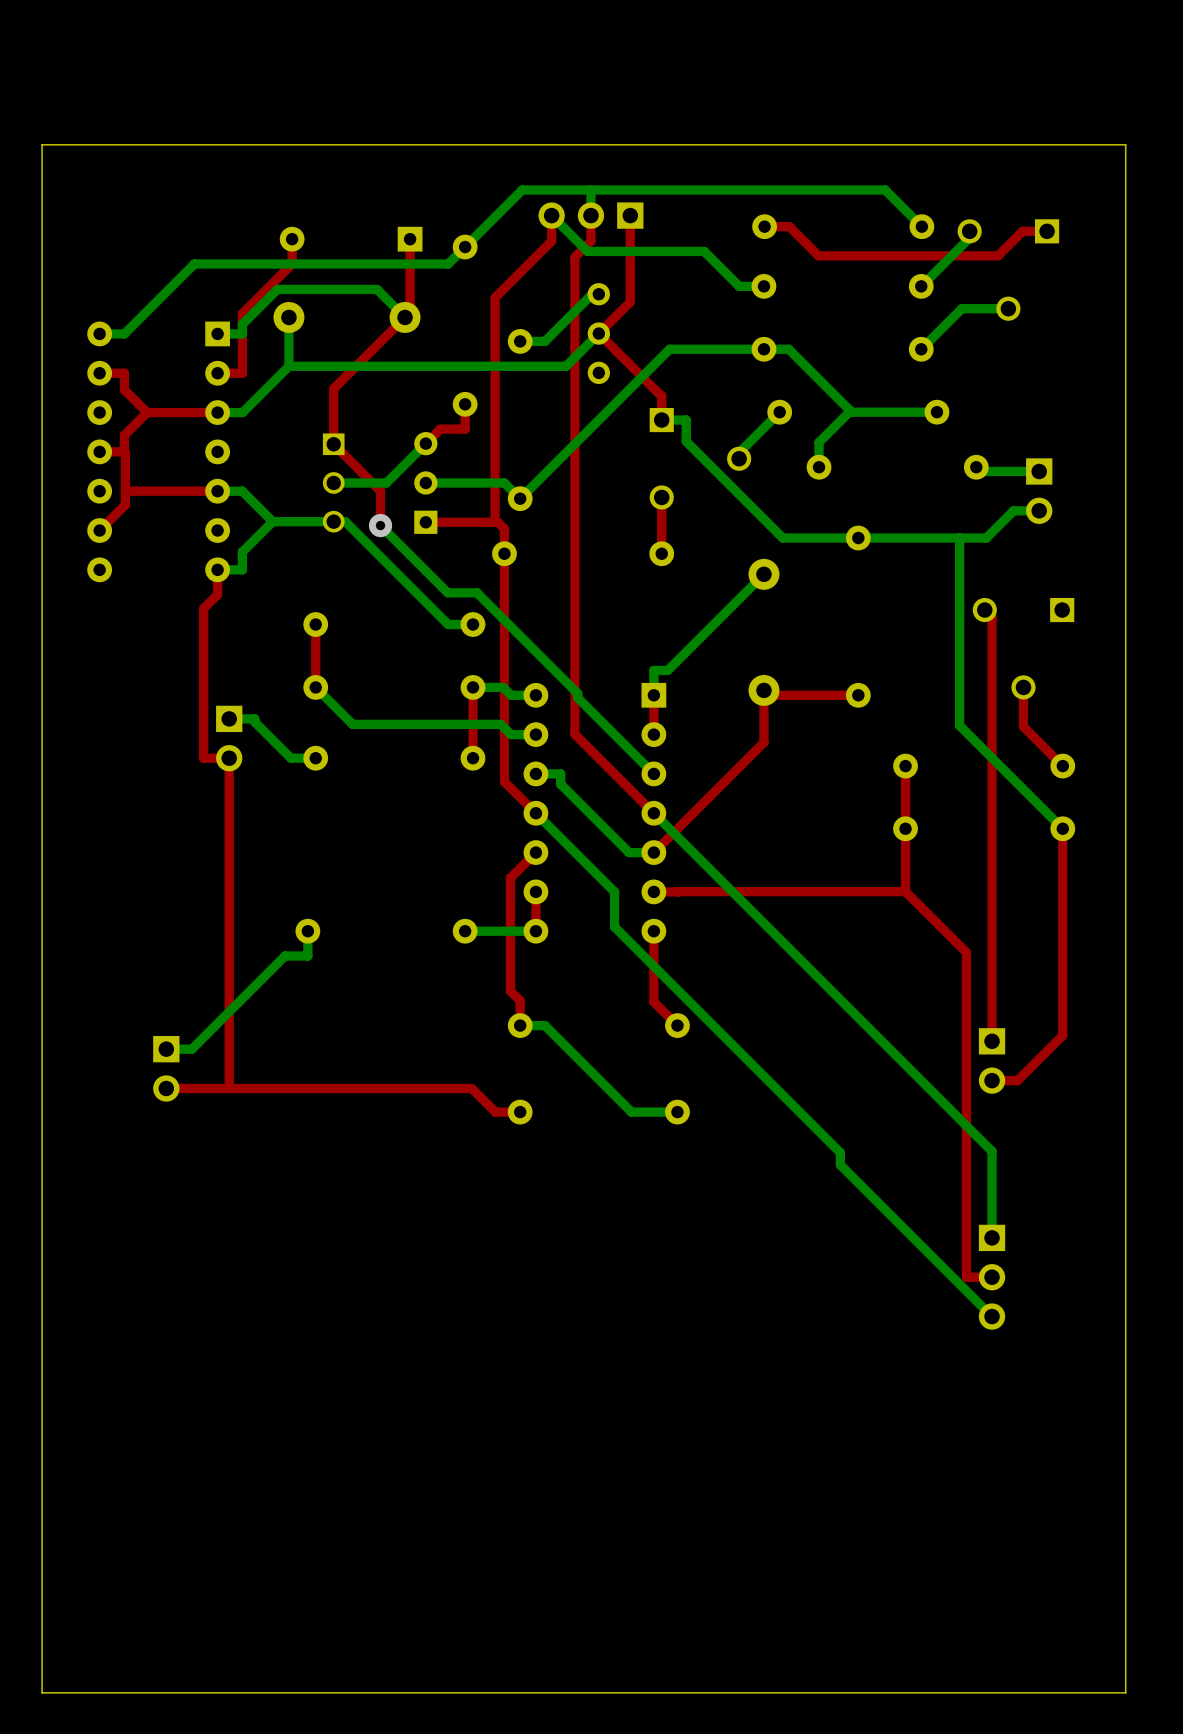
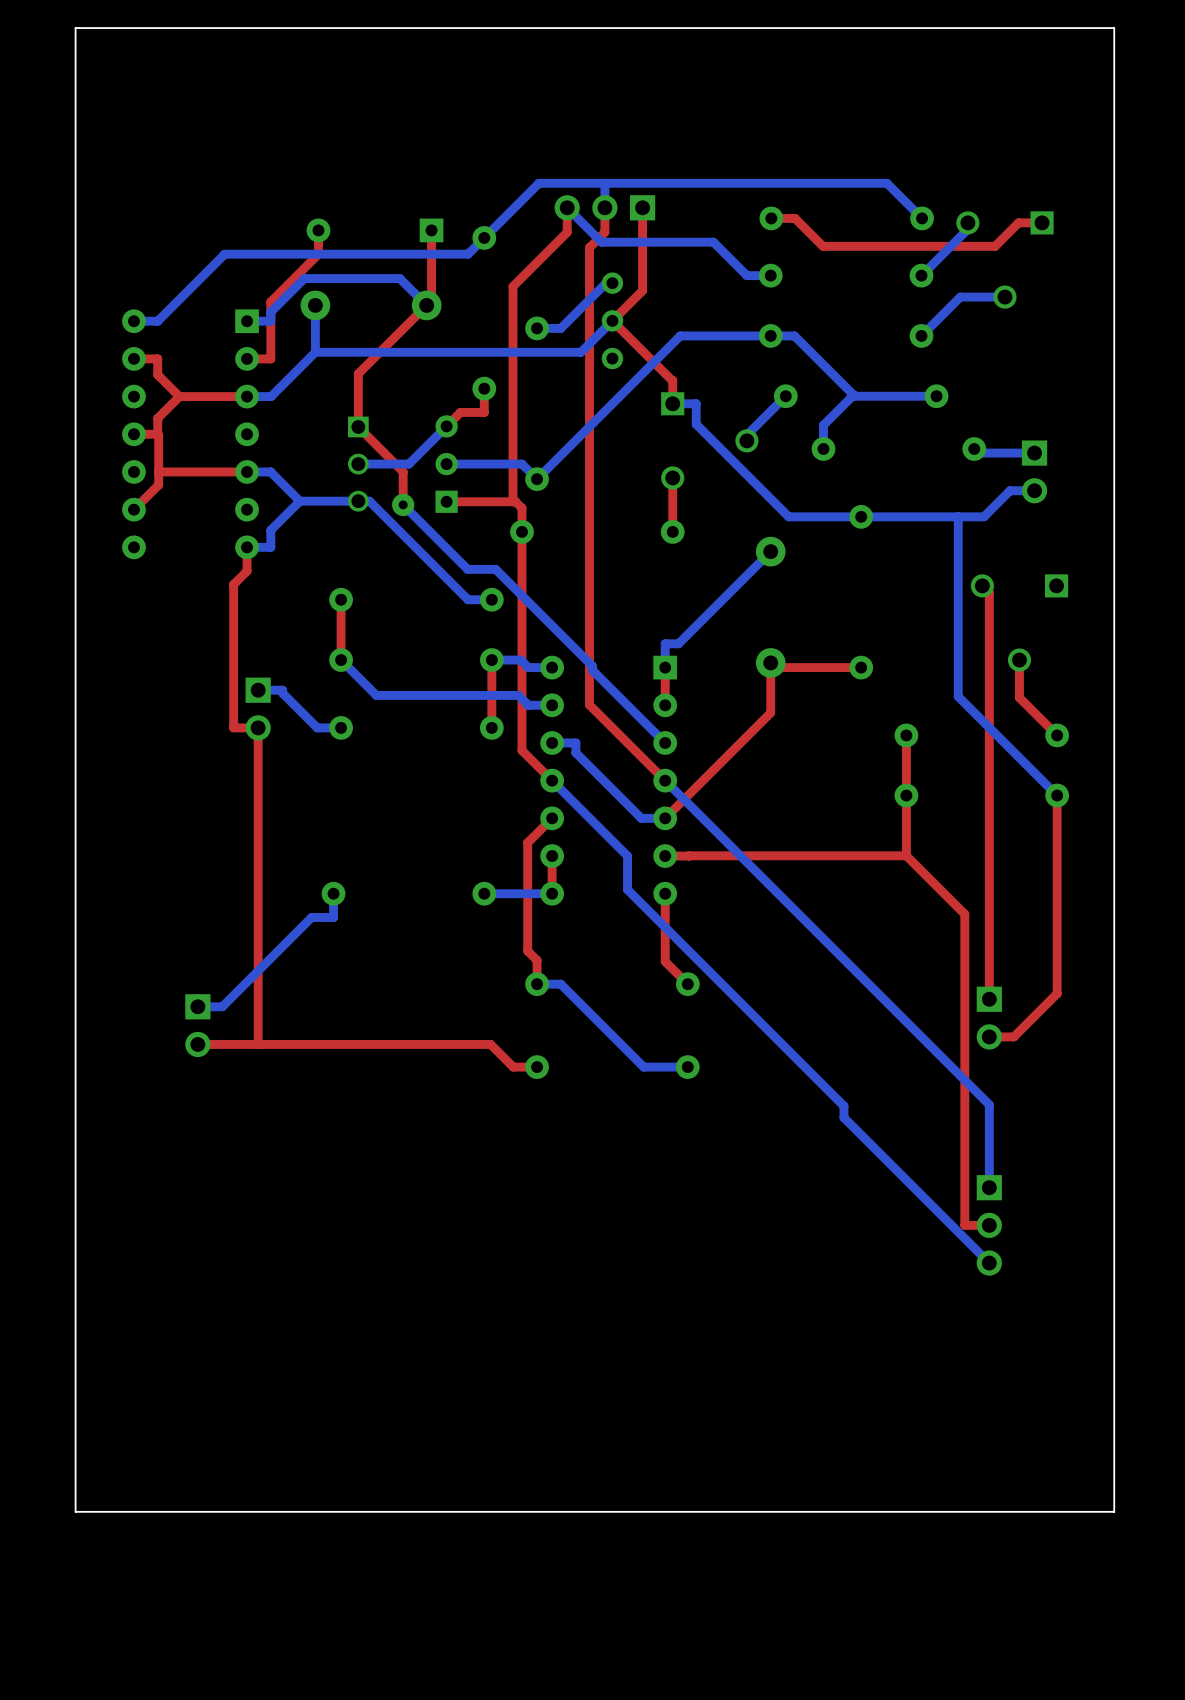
board edge: (1125, 144) (42, 144) (42, 1692) (1125, 1692) (1125, 144) -> (1114, 28) (1114, 1511) (75, 1511) (75, 28) (1114, 28)

